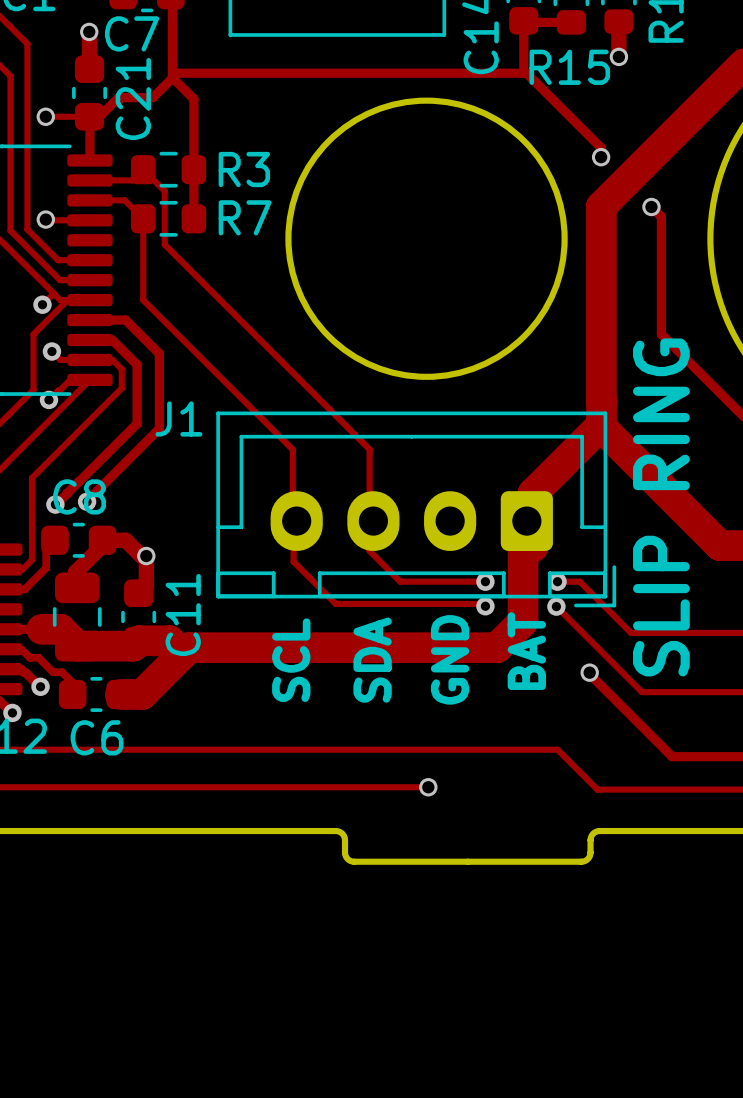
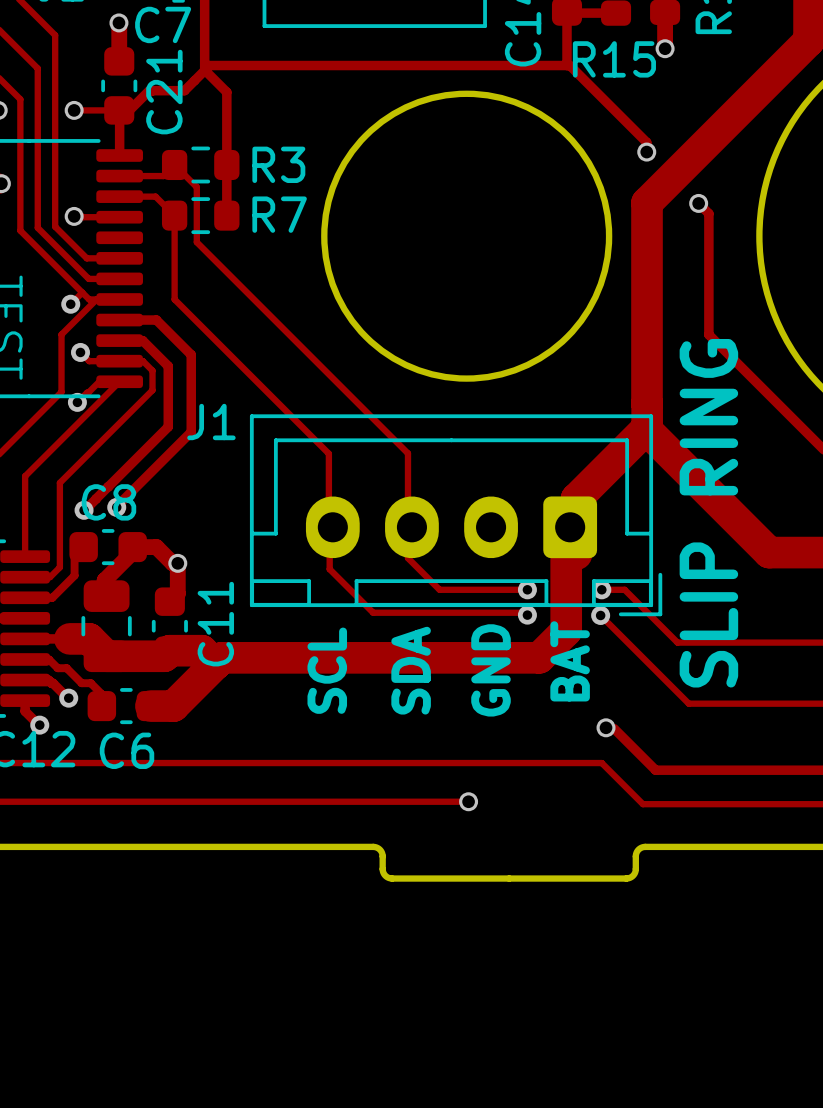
track: (589, 672) (672, 756) -> (614, 728) (655, 770) (719, 770)
via position: (589, 672) -> (606, 727)

